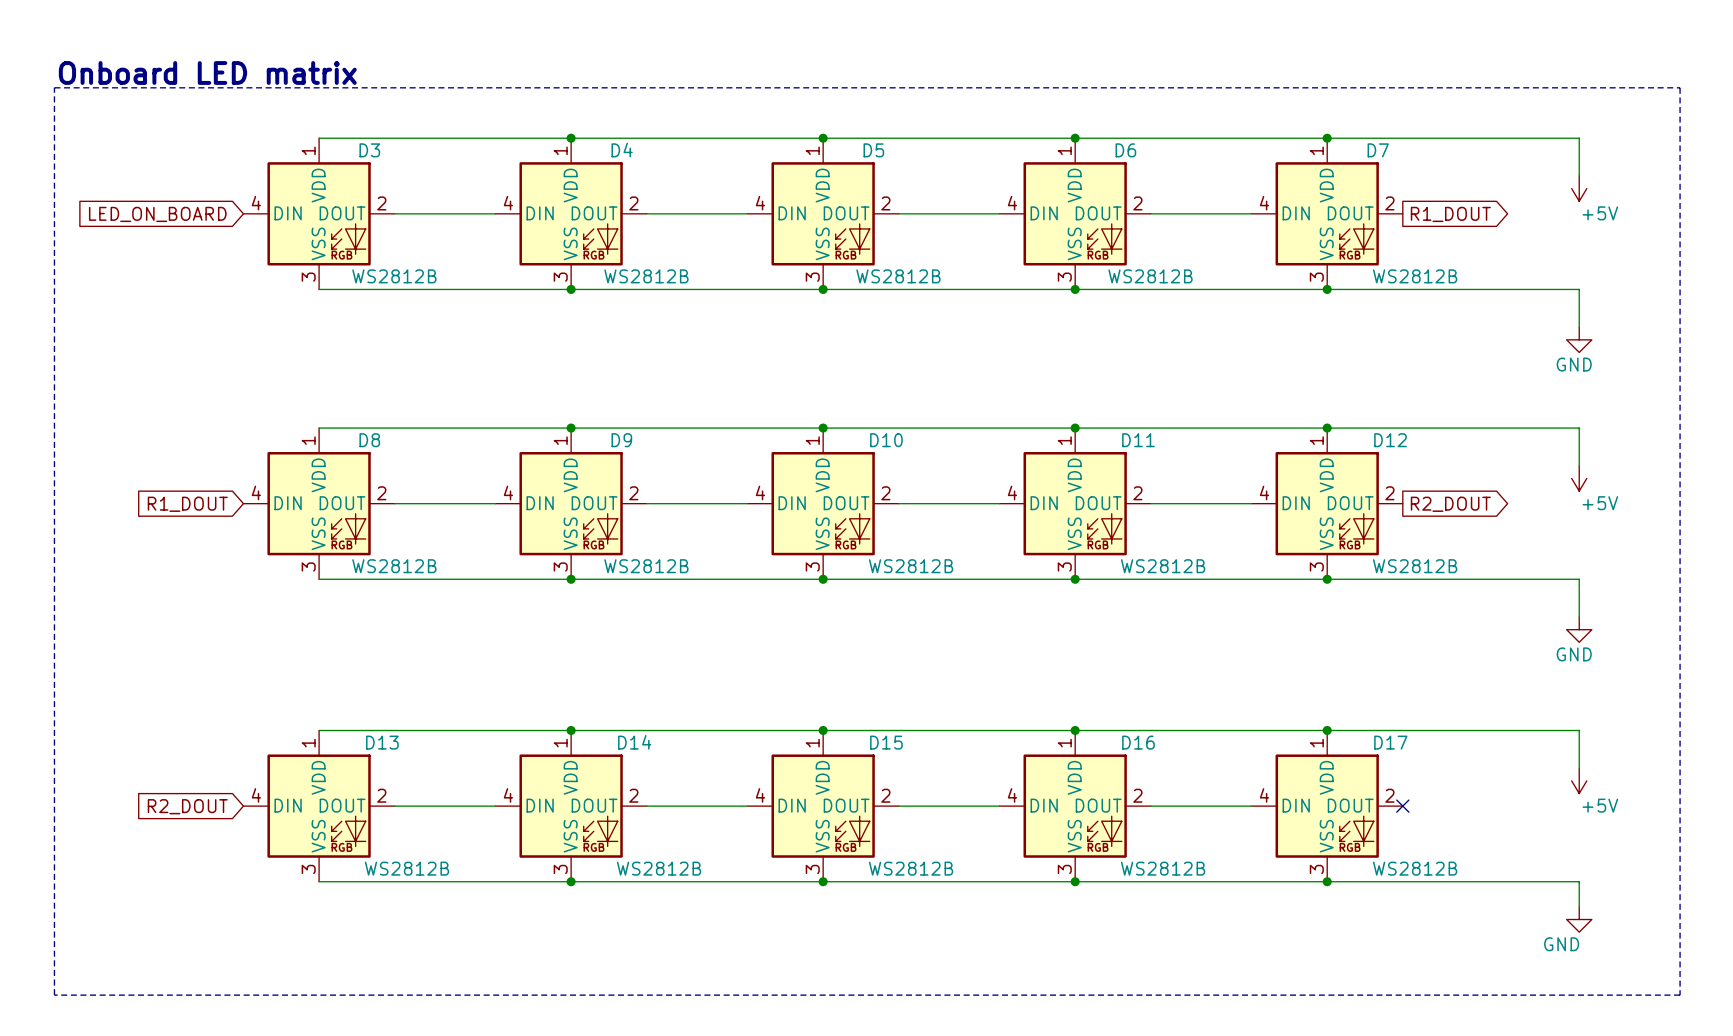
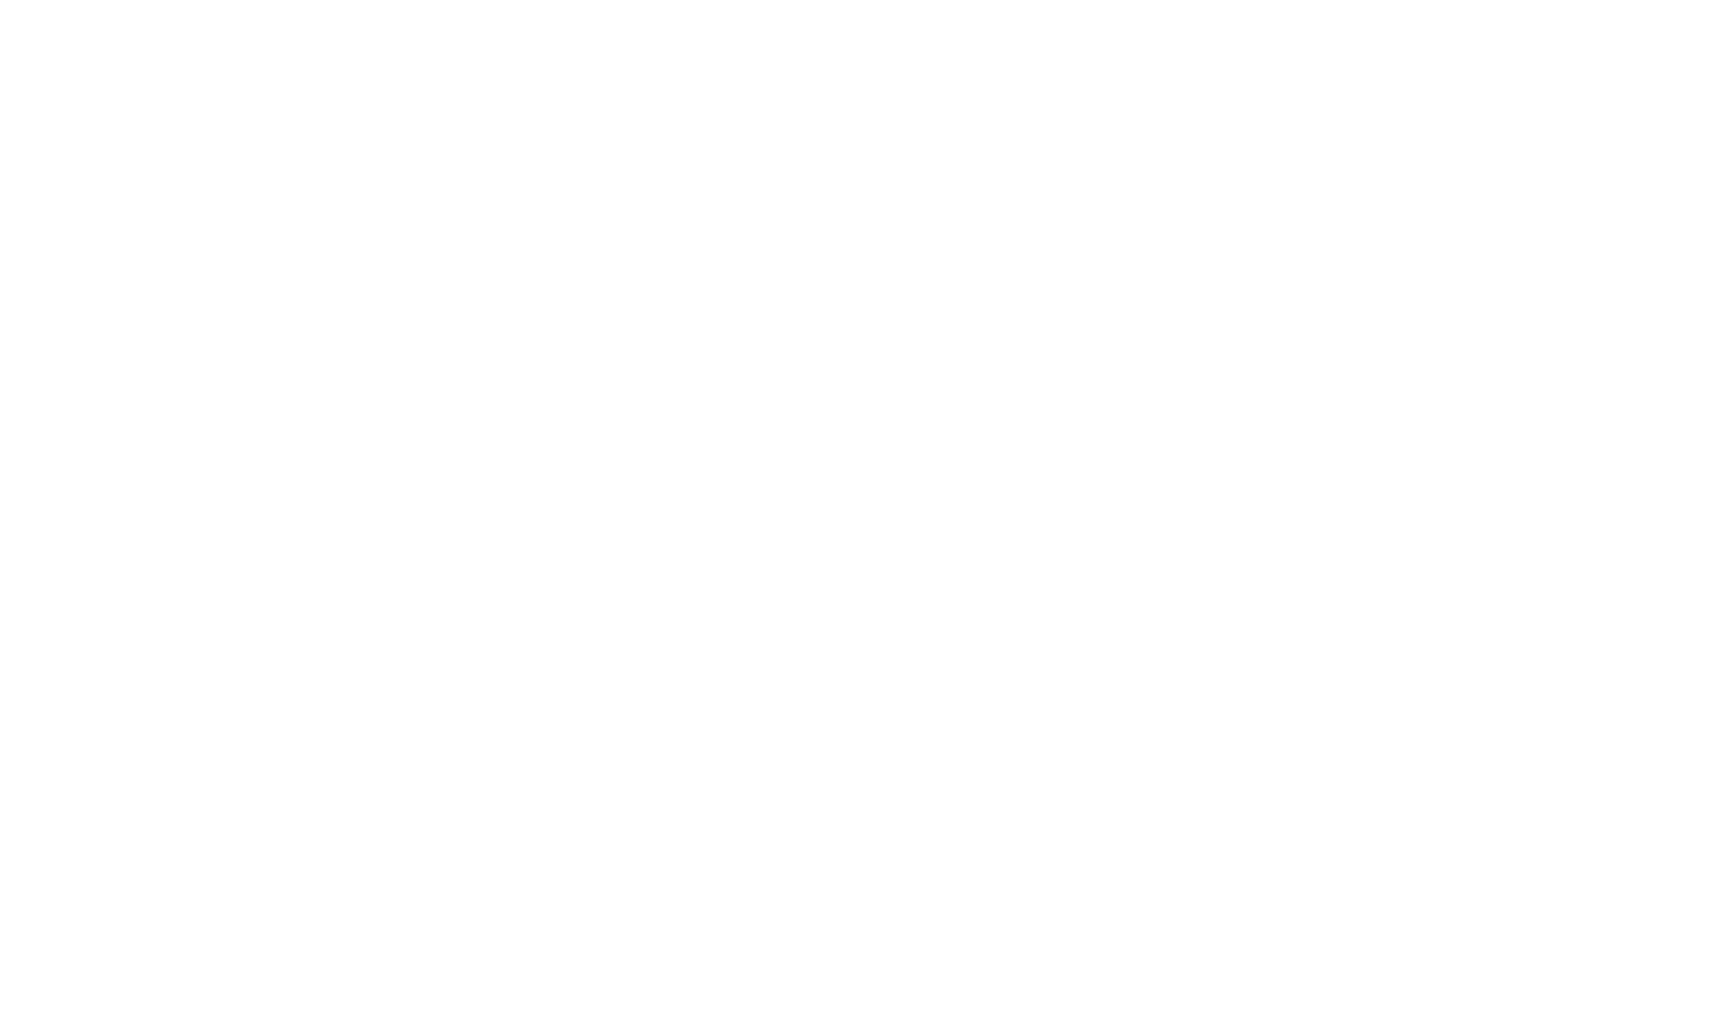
text: Onboard LED matrix (207, 72) -> none
line: (54, 87) (1680, 87) (1680, 995) (54, 995) (54, 87) -> none
wire: (319, 138) (1579, 138) (1579, 176) -> none
junction: (571, 138) -> none
junction: (823, 138) -> none
junction: (1075, 138) -> none
junction: (1327, 138) -> none
power symbol: +5V (1579, 188) -> none
D3: WS2812B (319, 213) -> none
wire: (394, 213) (495, 213) -> none
D4: WS2812B (571, 213) -> none
wire: (646, 213) (747, 213) -> none
D5: WS2812B (823, 213) -> none
wire: (898, 213) (999, 213) -> none
D6: WS2812B (1075, 213) -> none
wire: (1150, 213) (1251, 213) -> none
D7: WS2812B (1327, 213) -> none
global label: LED_ON_BOARD (157, 214) -> none
global label: R1_DOUT (1450, 214) -> none
wire: (319, 289) (1579, 289) (1579, 327) -> none
junction: (571, 289) -> none
junction: (823, 289) -> none
junction: (1075, 289) -> none
junction: (1327, 289) -> none
power symbol: GND (1579, 339) -> none
wire: (319, 428) (1579, 428) (1579, 465) -> none
junction: (571, 428) -> none
junction: (823, 428) -> none
junction: (1075, 428) -> none
junction: (1327, 428) -> none
power symbol: +5V (1579, 478) -> none
D8: WS2812B (319, 503) -> none
wire: (394, 503) (495, 503) -> none
D9: WS2812B (571, 503) -> none
wire: (646, 503) (747, 503) -> none
D10: WS2812B (823, 503) -> none
wire: (898, 503) (999, 503) -> none
D11: WS2812B (1075, 503) -> none
wire: (1150, 503) (1251, 503) -> none
D12: WS2812B (1327, 503) -> none
global label: R1_DOUT (187, 504) -> none
global label: R2_DOUT (1450, 504) -> none
wire: (319, 579) (1579, 579) (1579, 617) -> none
junction: (571, 579) -> none
junction: (823, 579) -> none
junction: (1075, 579) -> none
junction: (1327, 579) -> none
power symbol: GND (1579, 629) -> none
wire: (319, 730) (1579, 730) (1579, 768) -> none
junction: (571, 730) -> none
junction: (823, 730) -> none
junction: (1075, 730) -> none
junction: (1327, 730) -> none
power symbol: +5V (1579, 780) -> none
global label: R2_DOUT (187, 806) -> none
D13: WS2812B (319, 806) -> none
wire: (394, 806) (495, 806) -> none
D14: WS2812B (571, 806) -> none
wire: (646, 806) (747, 806) -> none
D15: WS2812B (823, 806) -> none
wire: (898, 806) (999, 806) -> none
D16: WS2812B (1075, 806) -> none
wire: (1150, 806) (1251, 806) -> none
D17: WS2812B (1327, 806) -> none
no-connect mark: (1402, 806) -> none
wire: (319, 881) (1579, 881) (1579, 906) -> none
junction: (571, 881) -> none
junction: (823, 881) -> none
junction: (1075, 881) -> none
junction: (1327, 881) -> none
power symbol: GND (1579, 919) -> none

